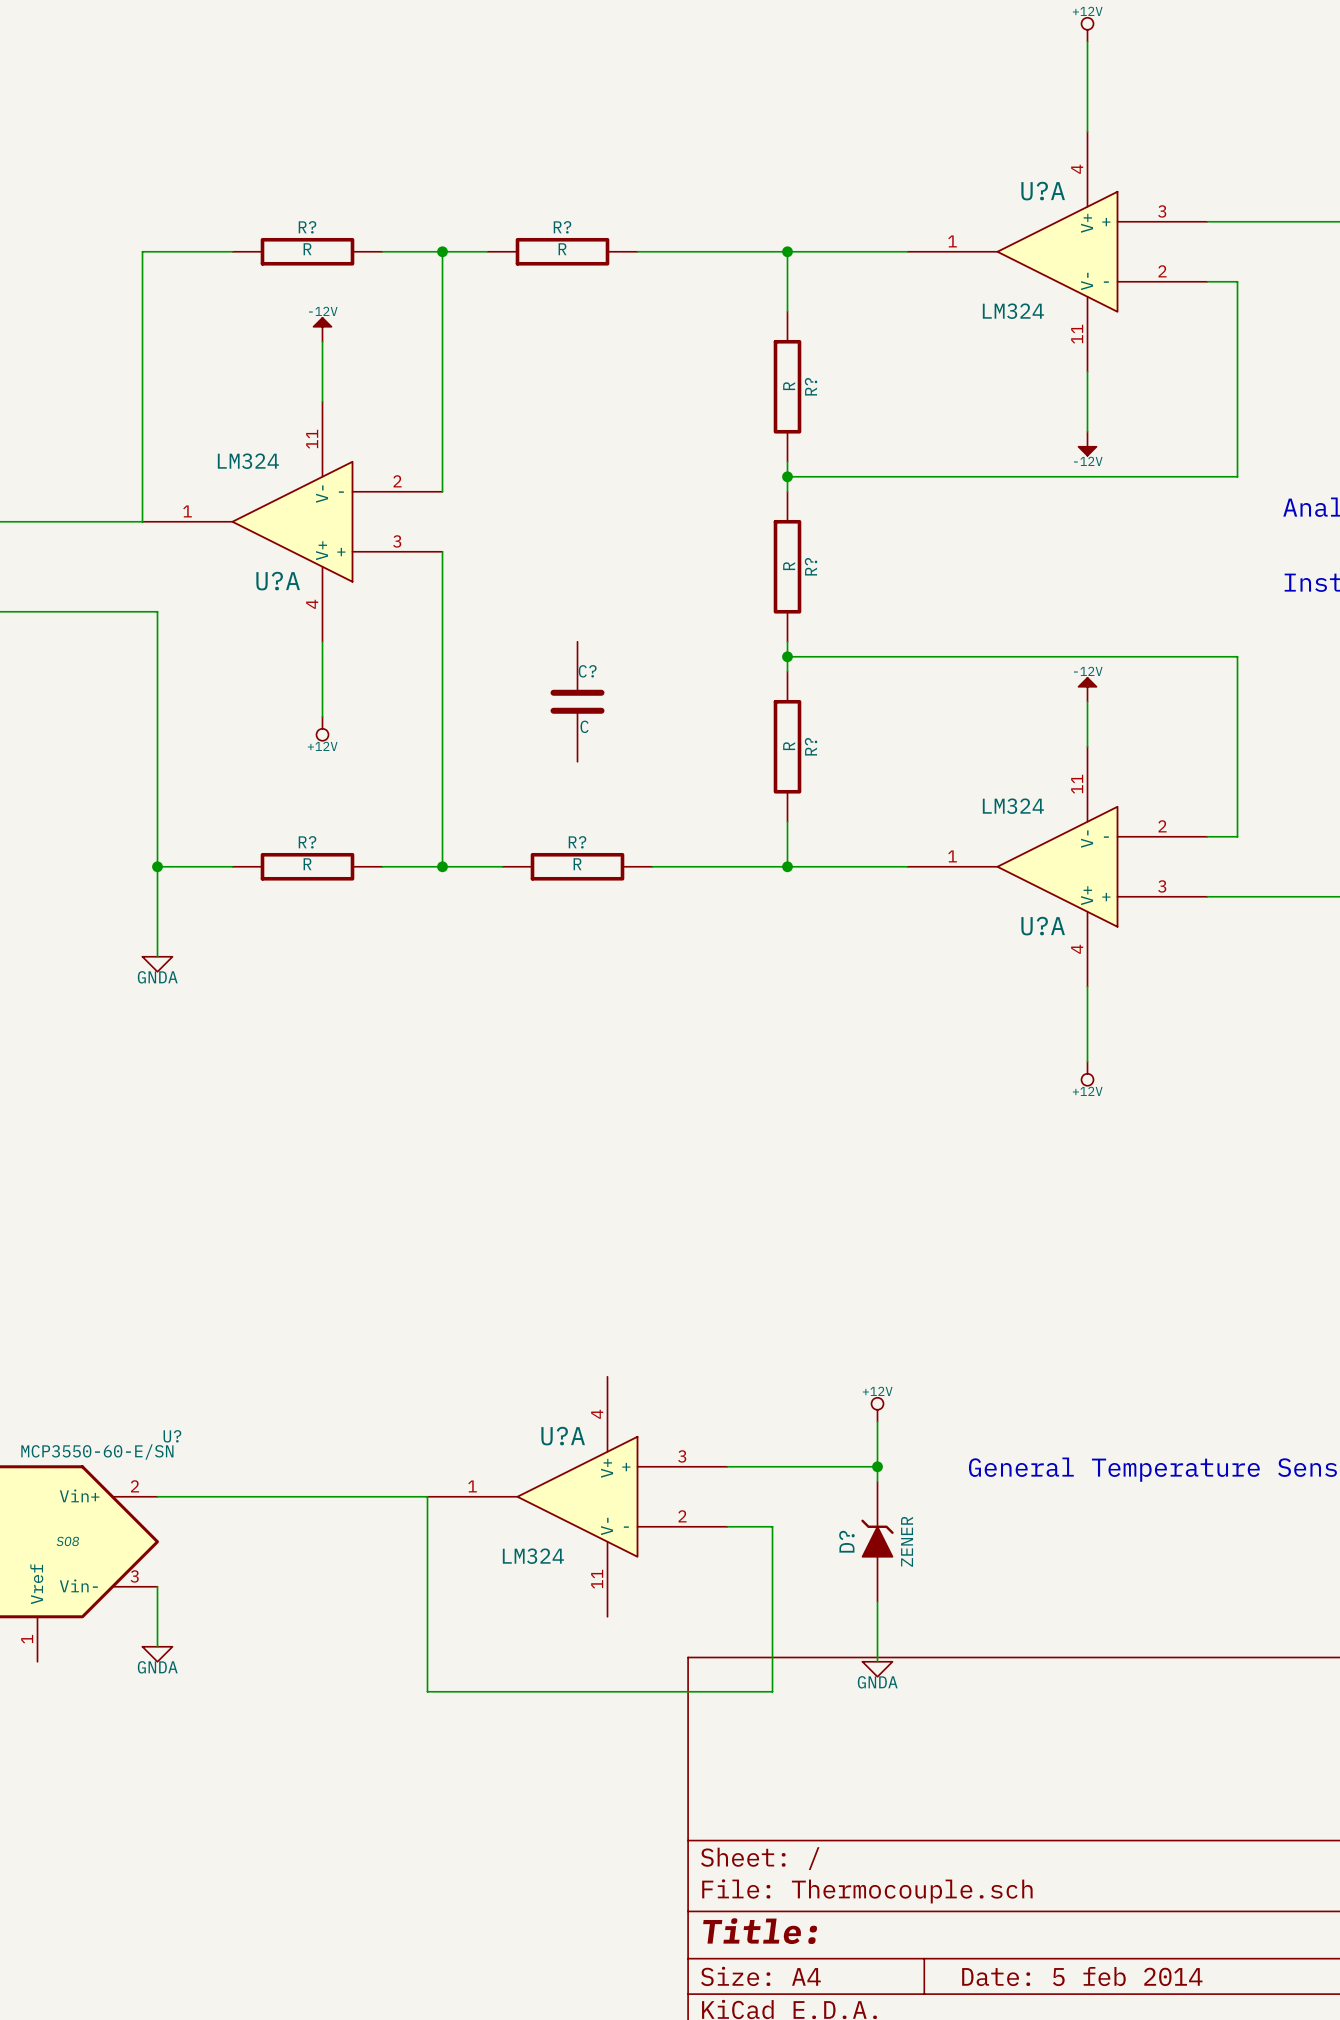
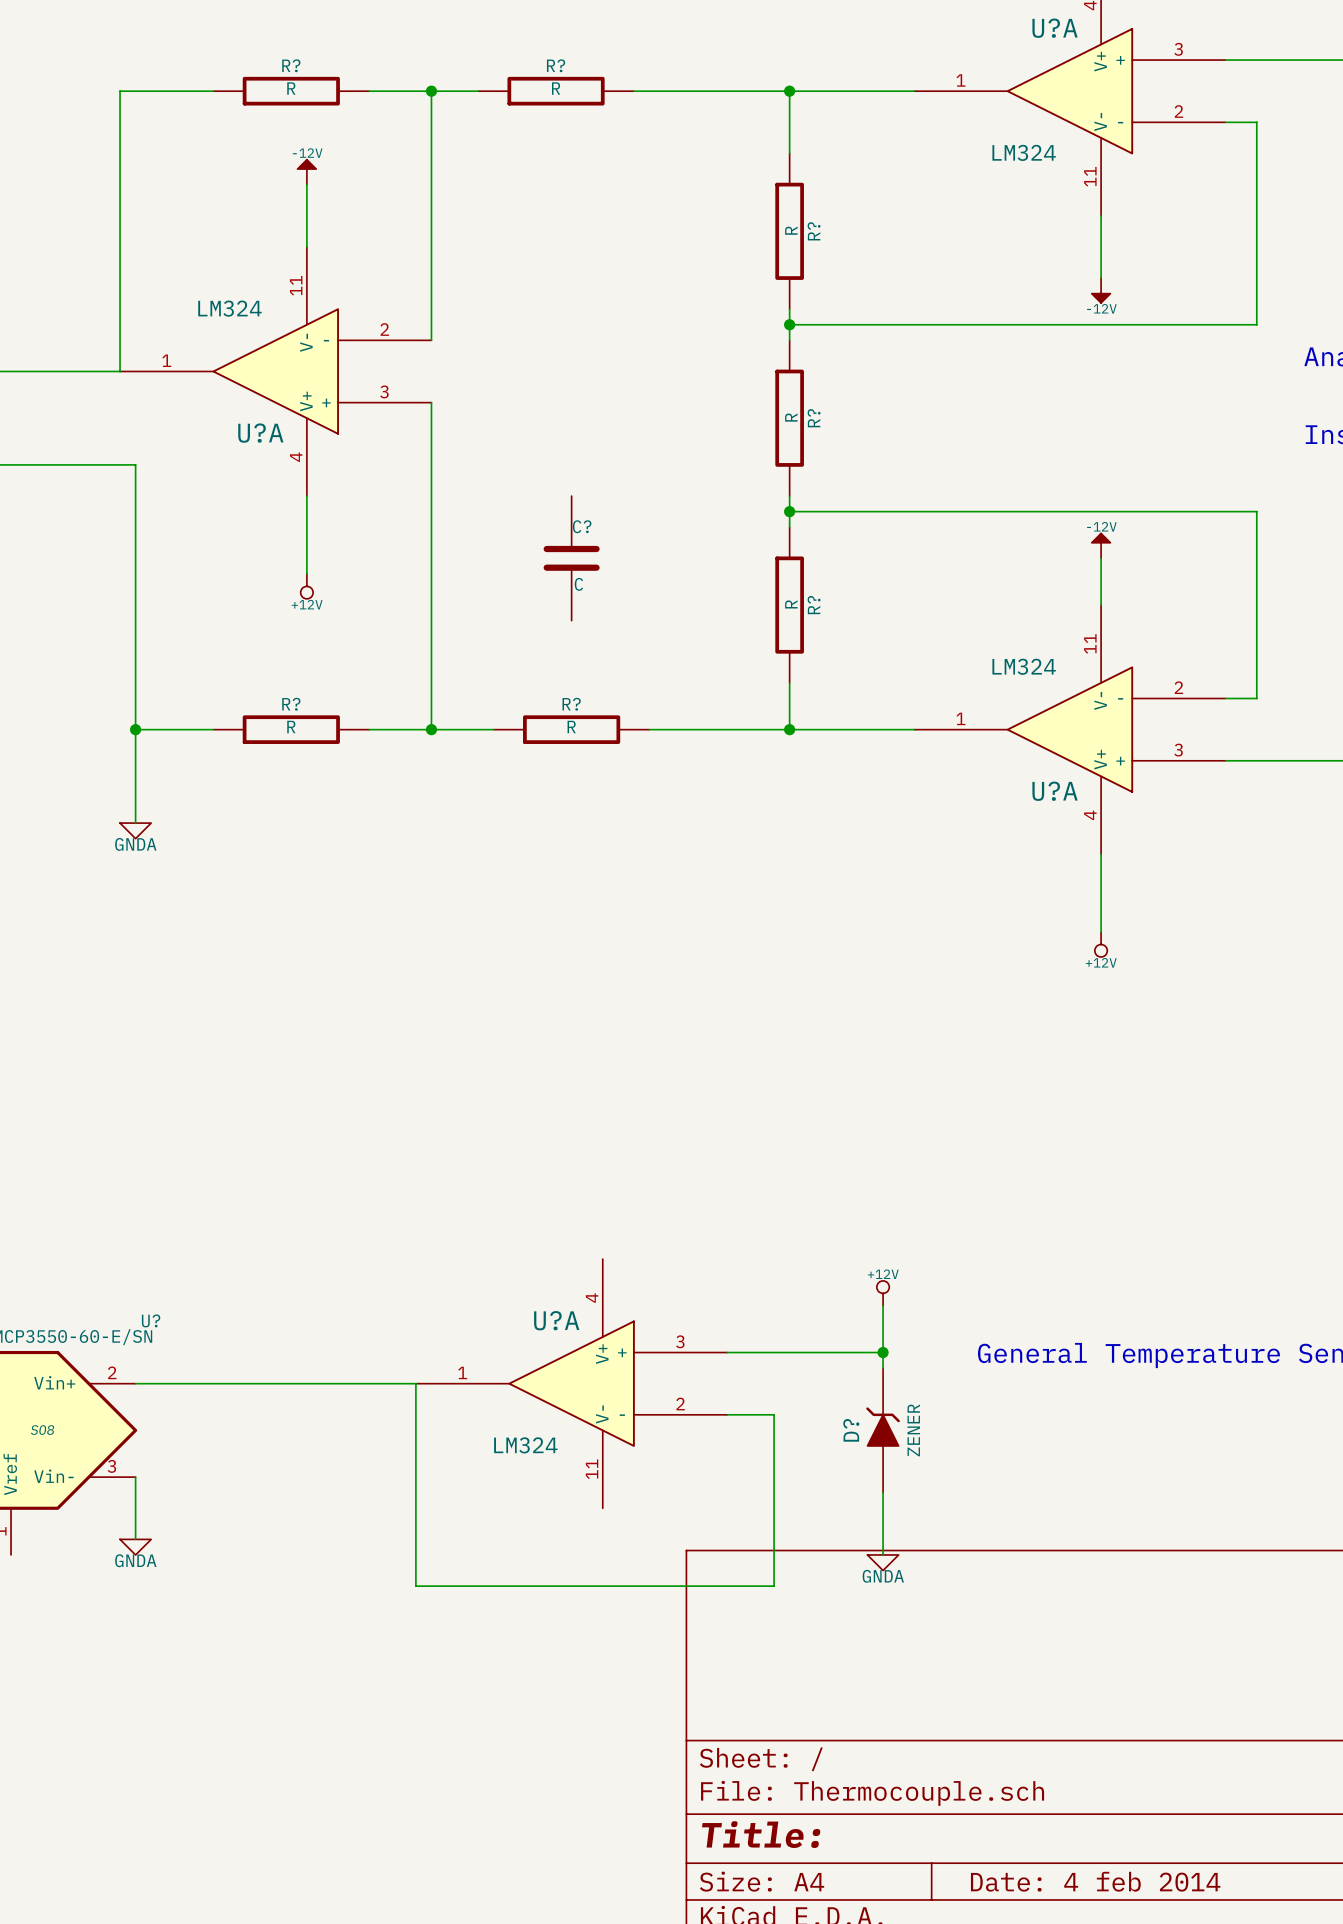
title block: Date: 5 feb 2014 (1082, 1976) -> Date: 4 feb 2014 (1095, 1881)

